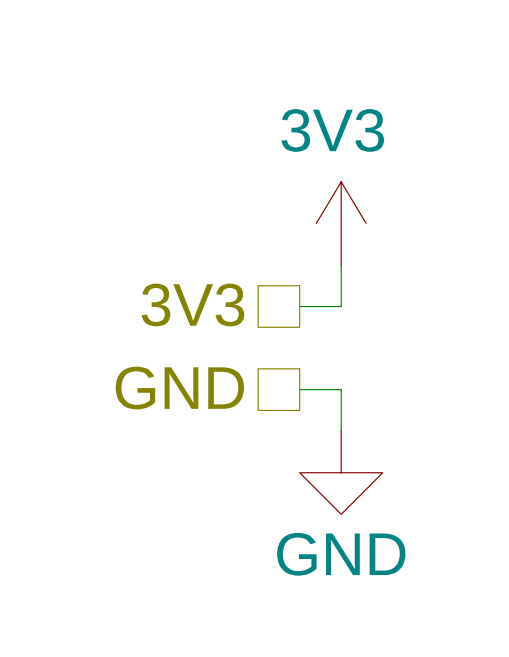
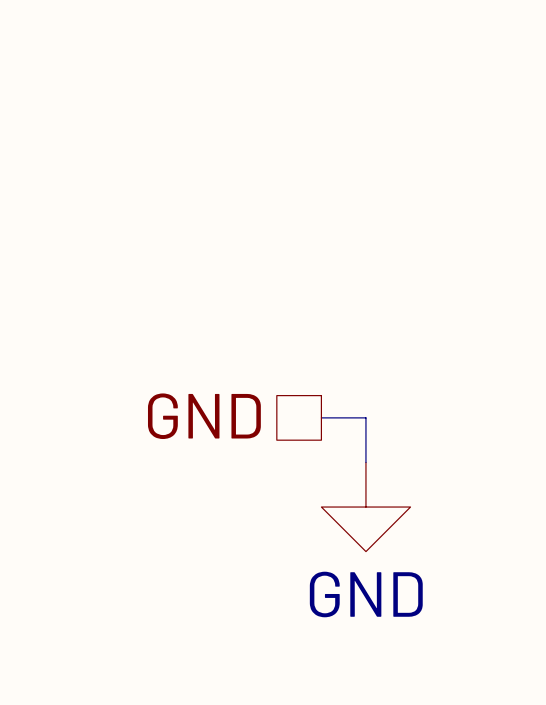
power symbol: 3V3 (341, 223) -> none
wire: (341, 264) (341, 306) (299, 306) -> none
hierarchical label: 3V3 (192, 304) -> none

